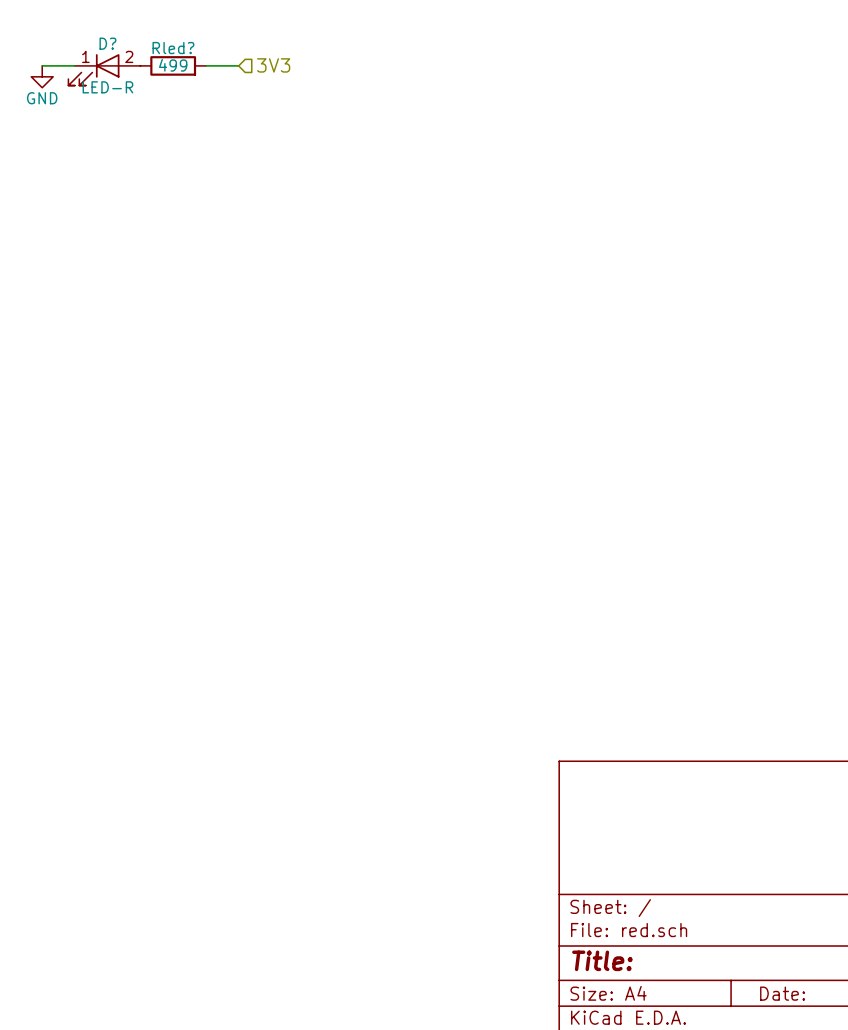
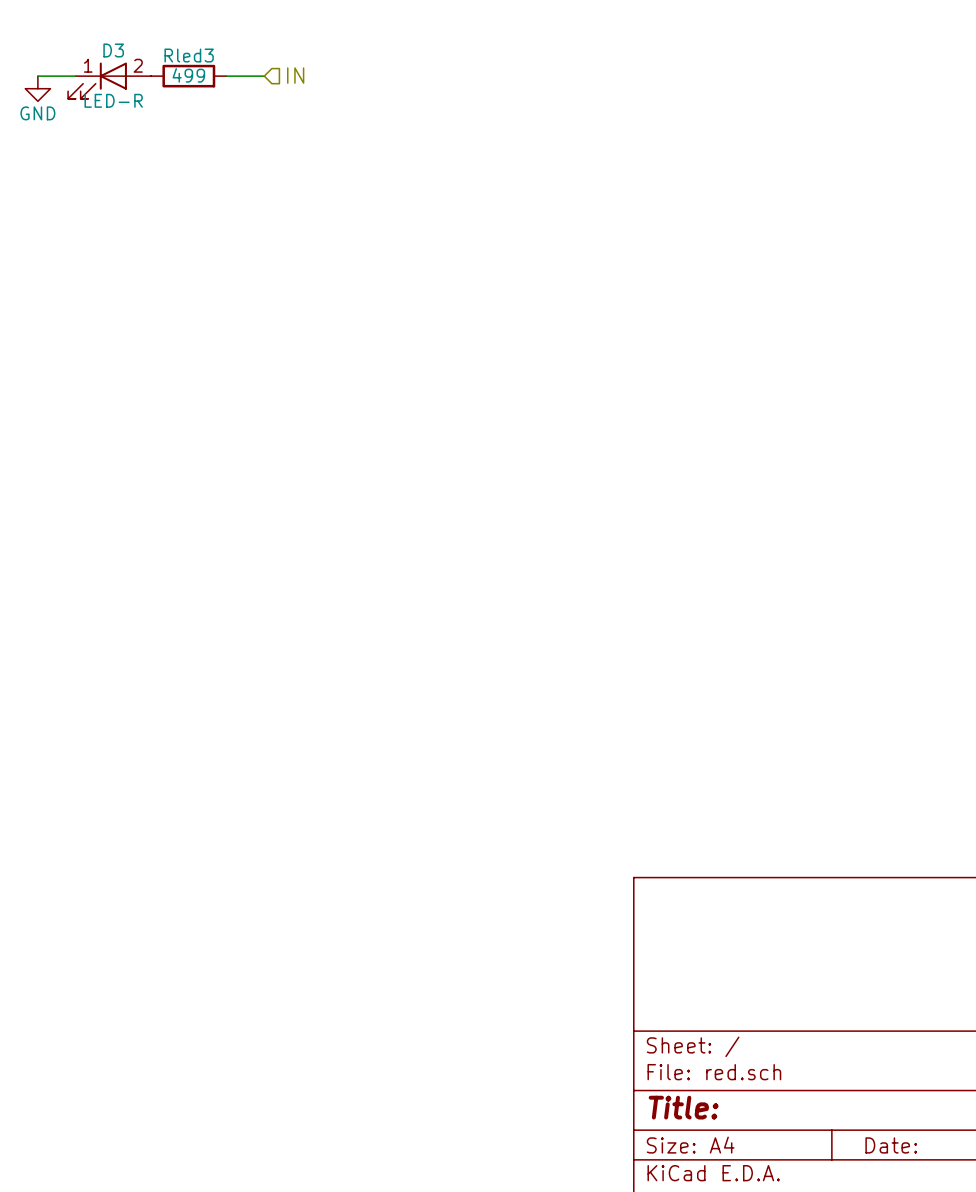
D? name: D? (107, 43) -> D3 (113, 50)
Rled? name: Rled? (173, 48) -> Rled3 (189, 55)
hierarchical label: 3V3 (273, 65) -> IN (295, 75)

